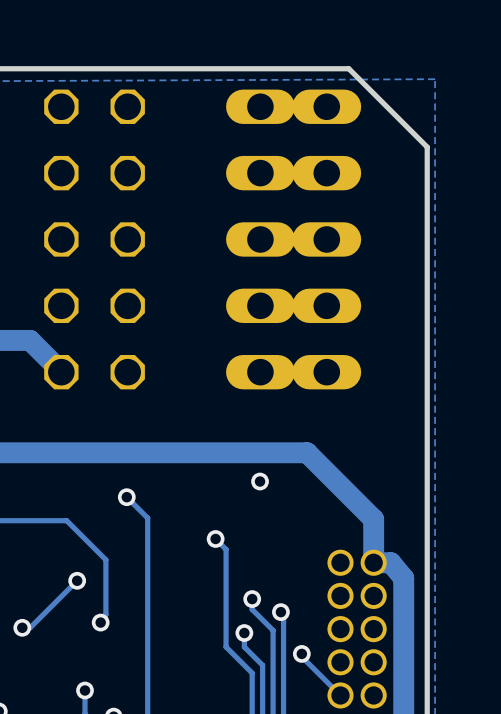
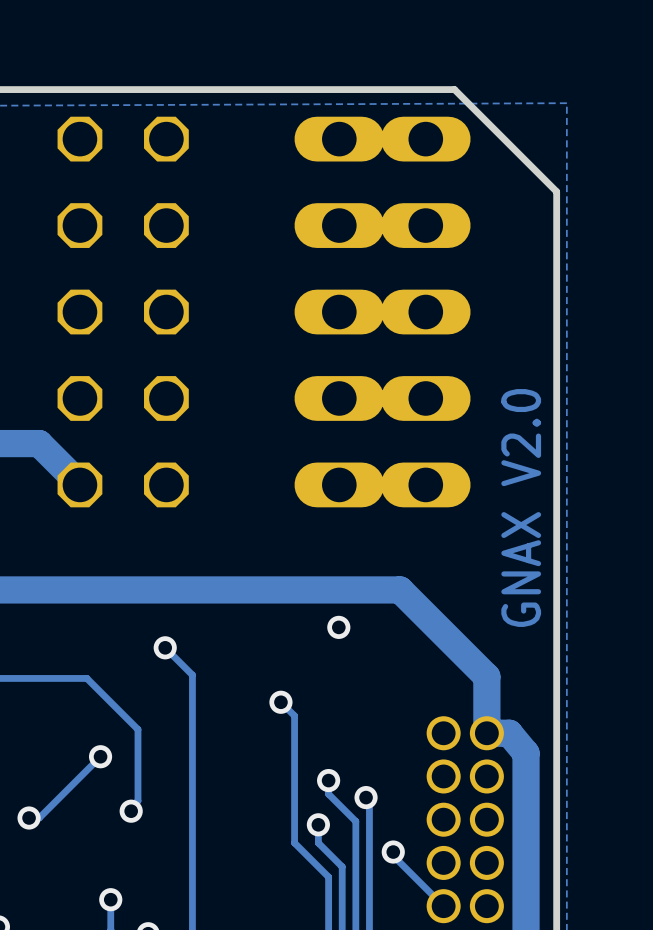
text: none -> GNAX V2.0 (521, 508)

